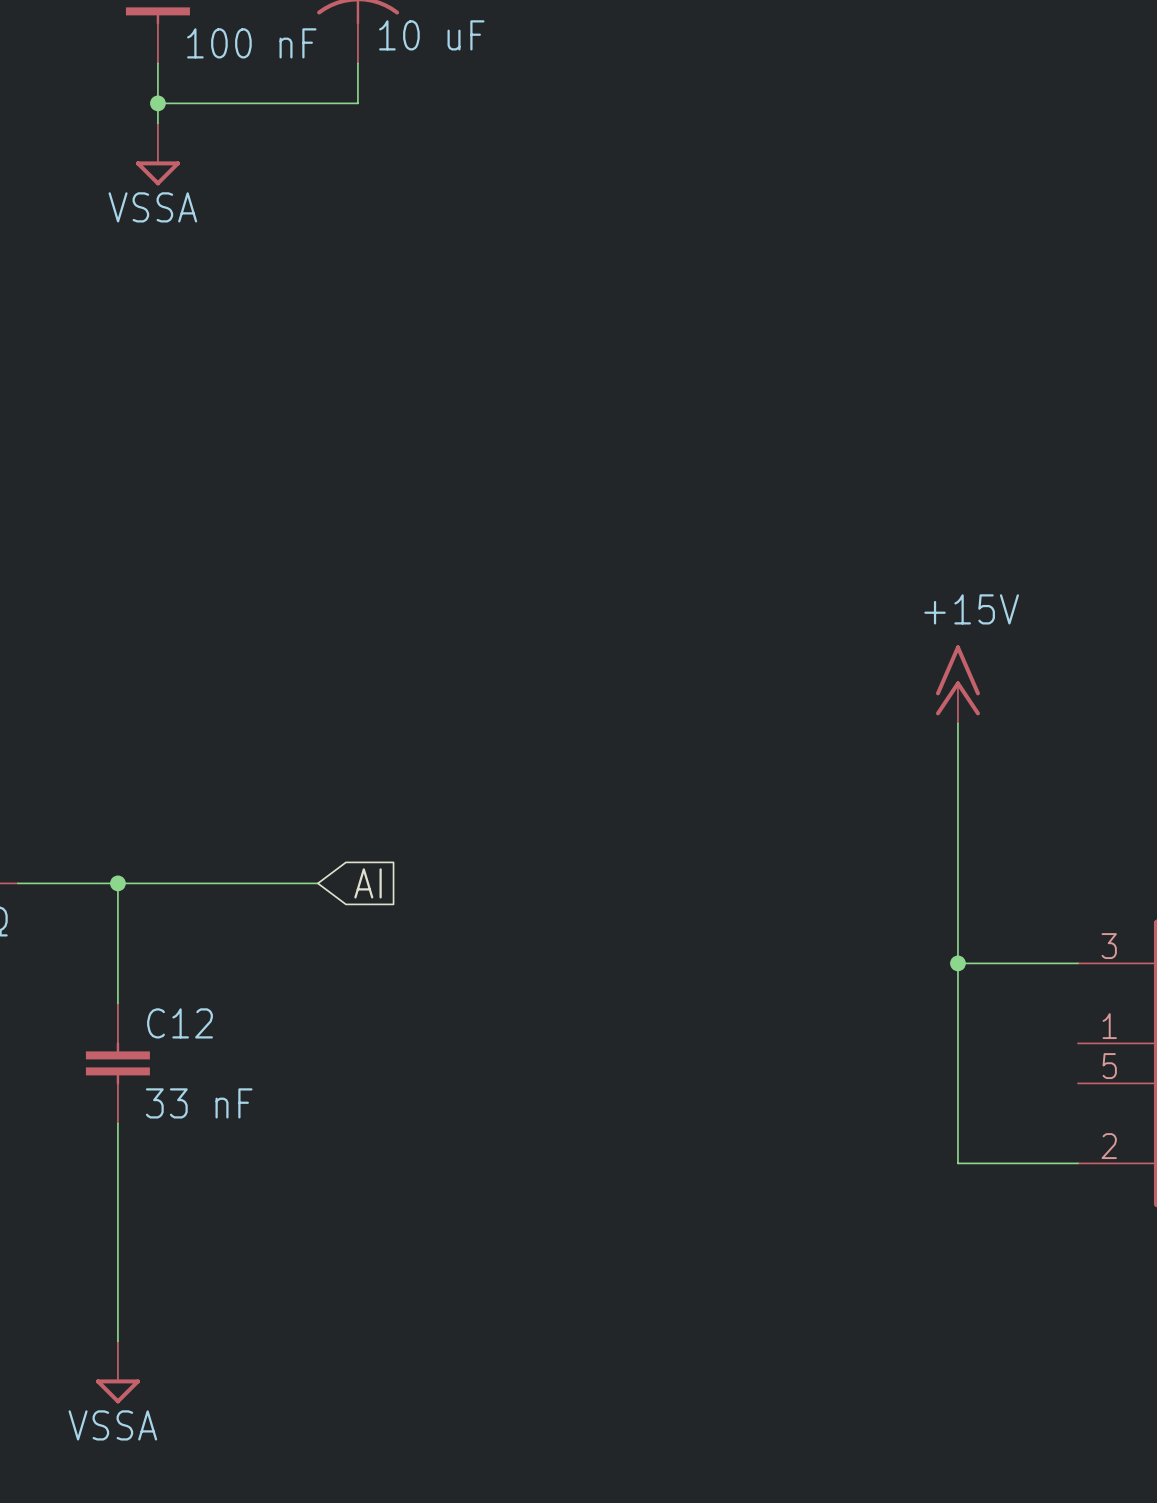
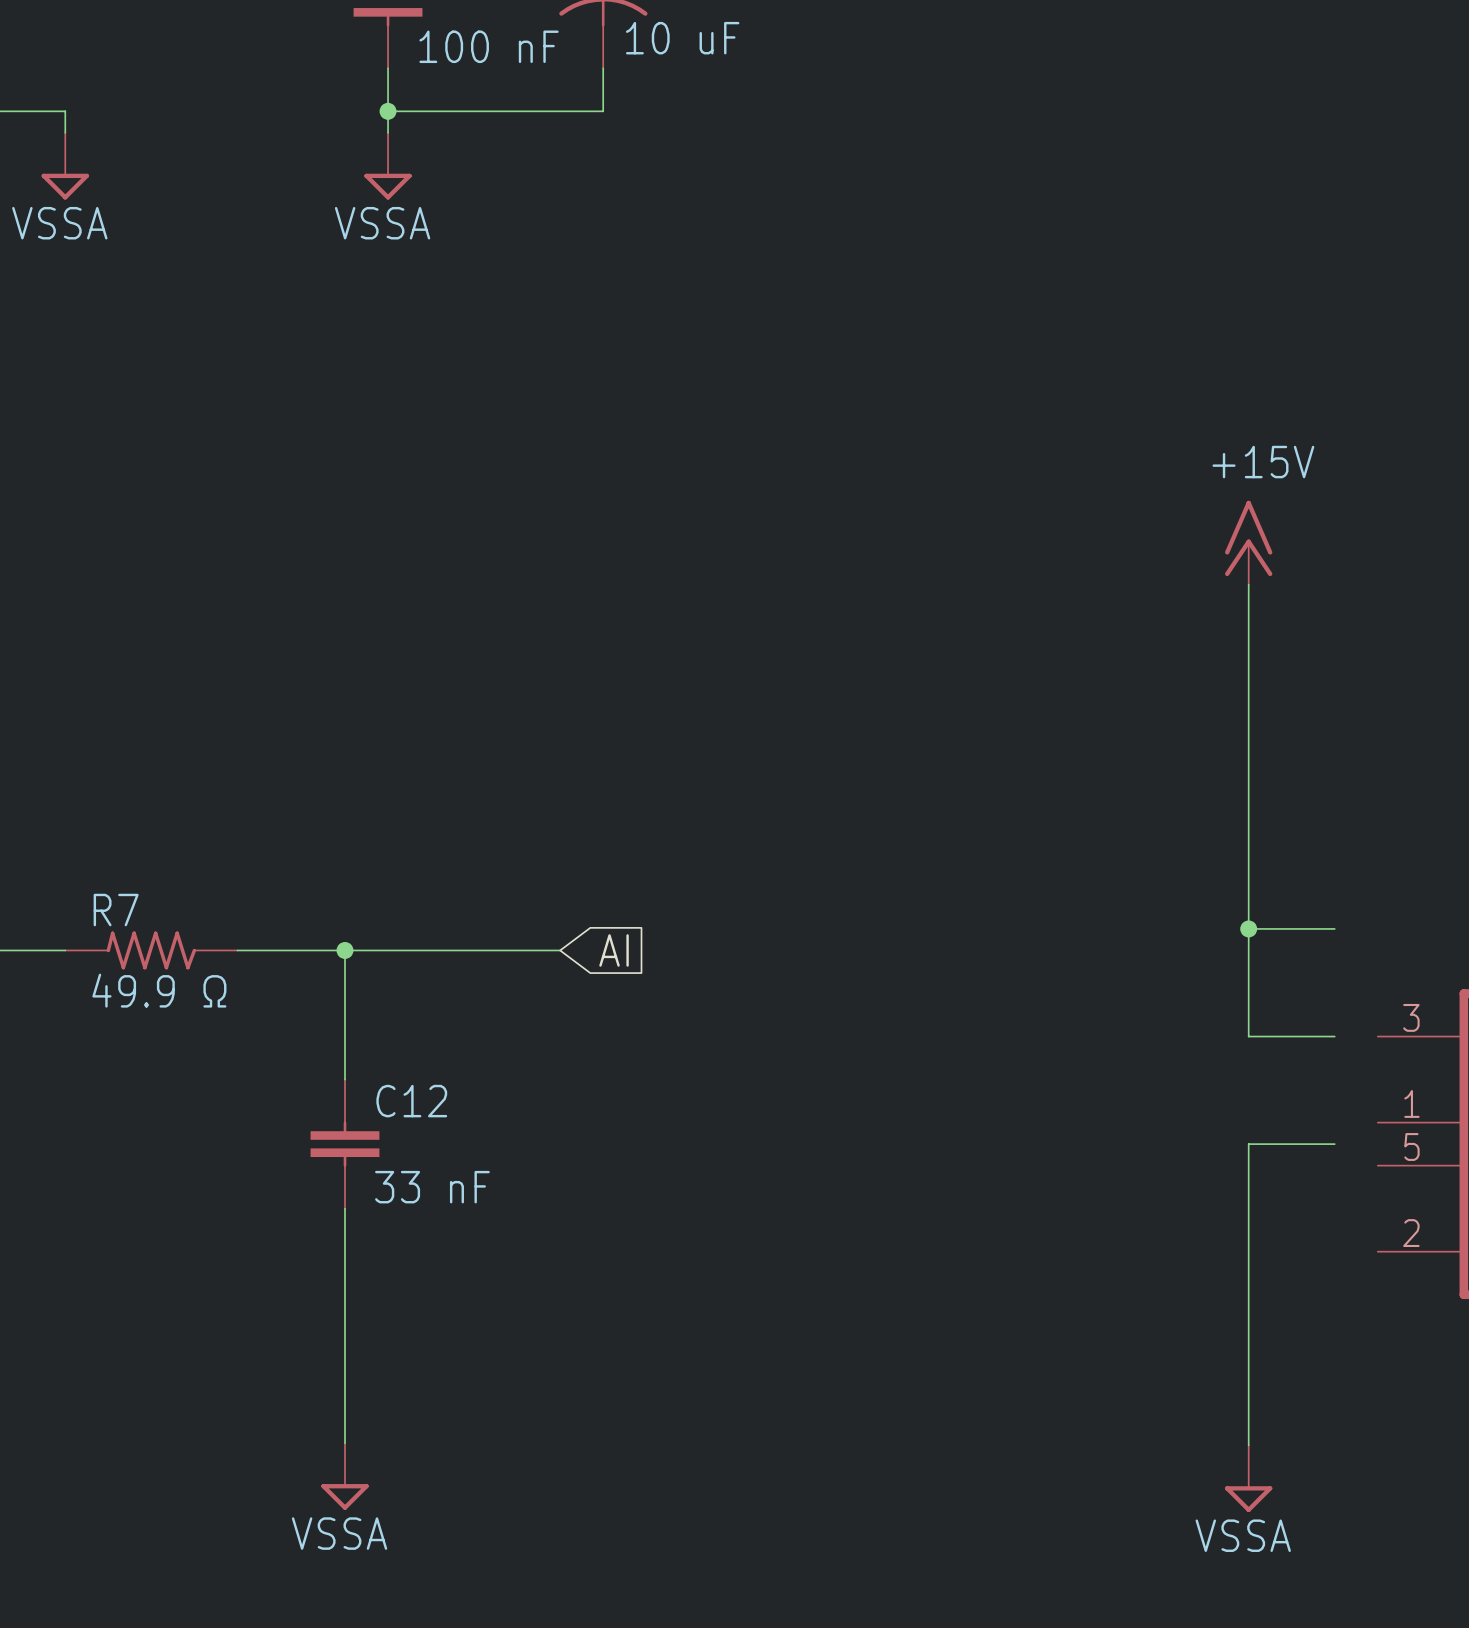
wire: none -> (1248, 584) (1248, 778)
power symbol position: +15V (957, 684) -> +15V (1248, 542)
wire: none -> (1248, 928) (1334, 928)
junction: none -> (1248, 928)
wire: (957, 963) (957, 1063) -> (1334, 1144) (1248, 1144)
junction: (957, 963) -> none
wire: (1037, 963) (1077, 963) -> none
wire: (957, 1163) (1077, 1163) -> (1248, 1251) (1248, 1445)
power symbol: none -> VSSA (1248, 1478)

